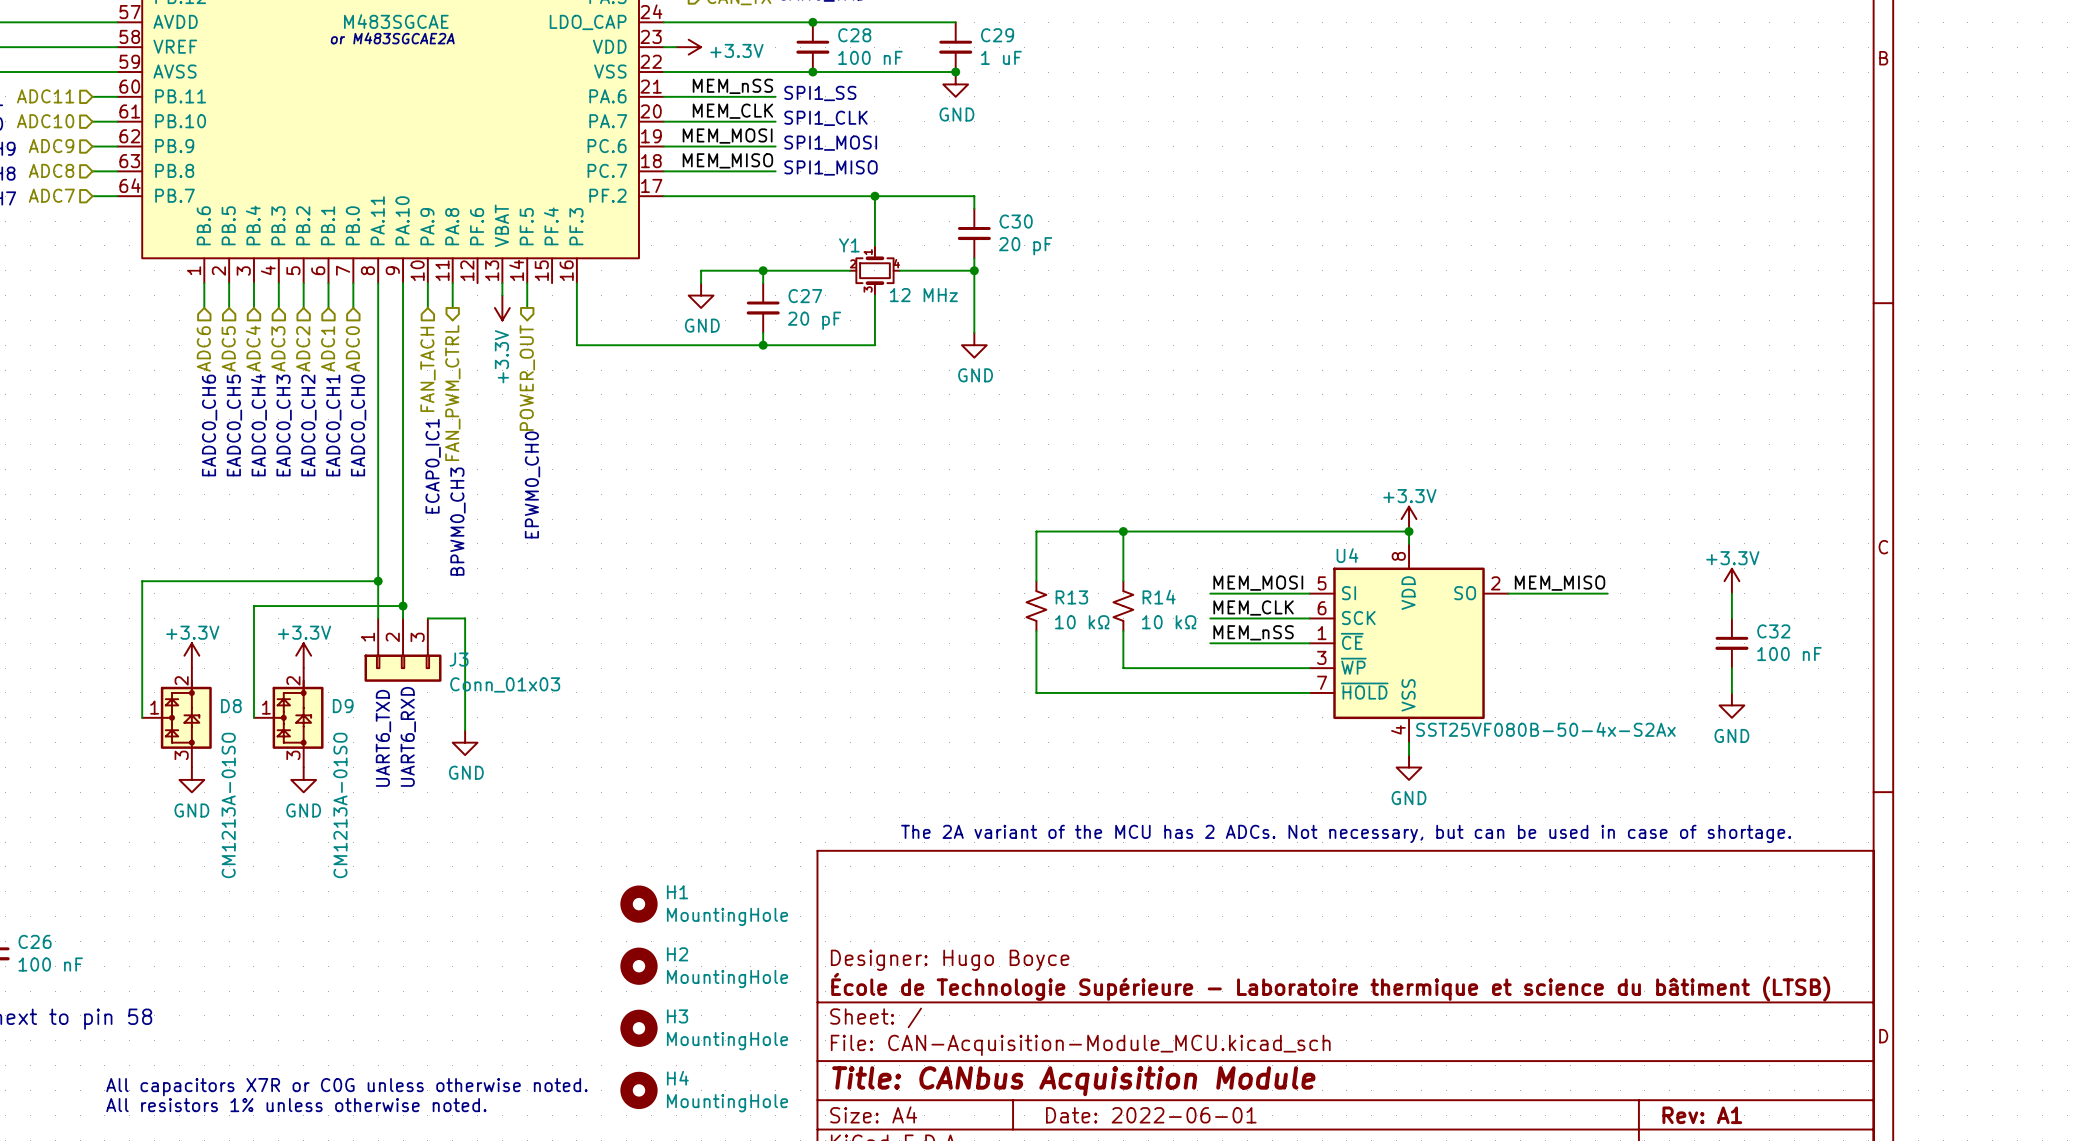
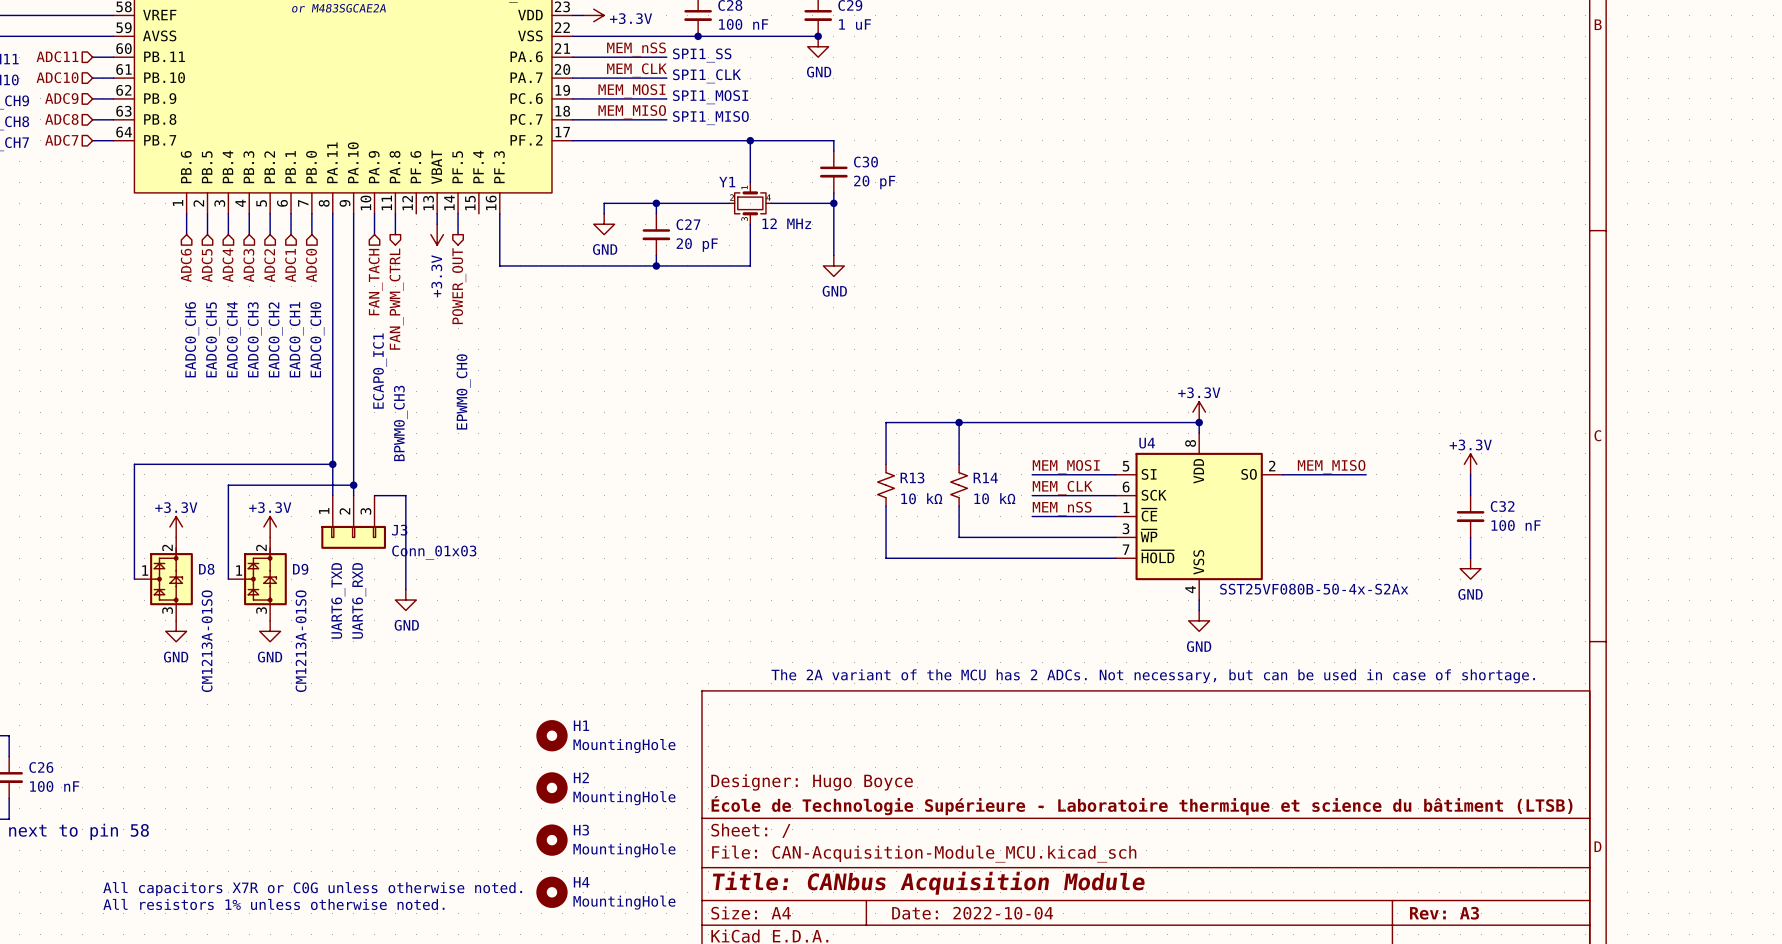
title block: Date: 2022-06-01 (1151, 1115) -> Date: 2022-10-04 (972, 913)
title block: Rev: A1 (1702, 1115) -> Rev: A3 (1444, 913)

